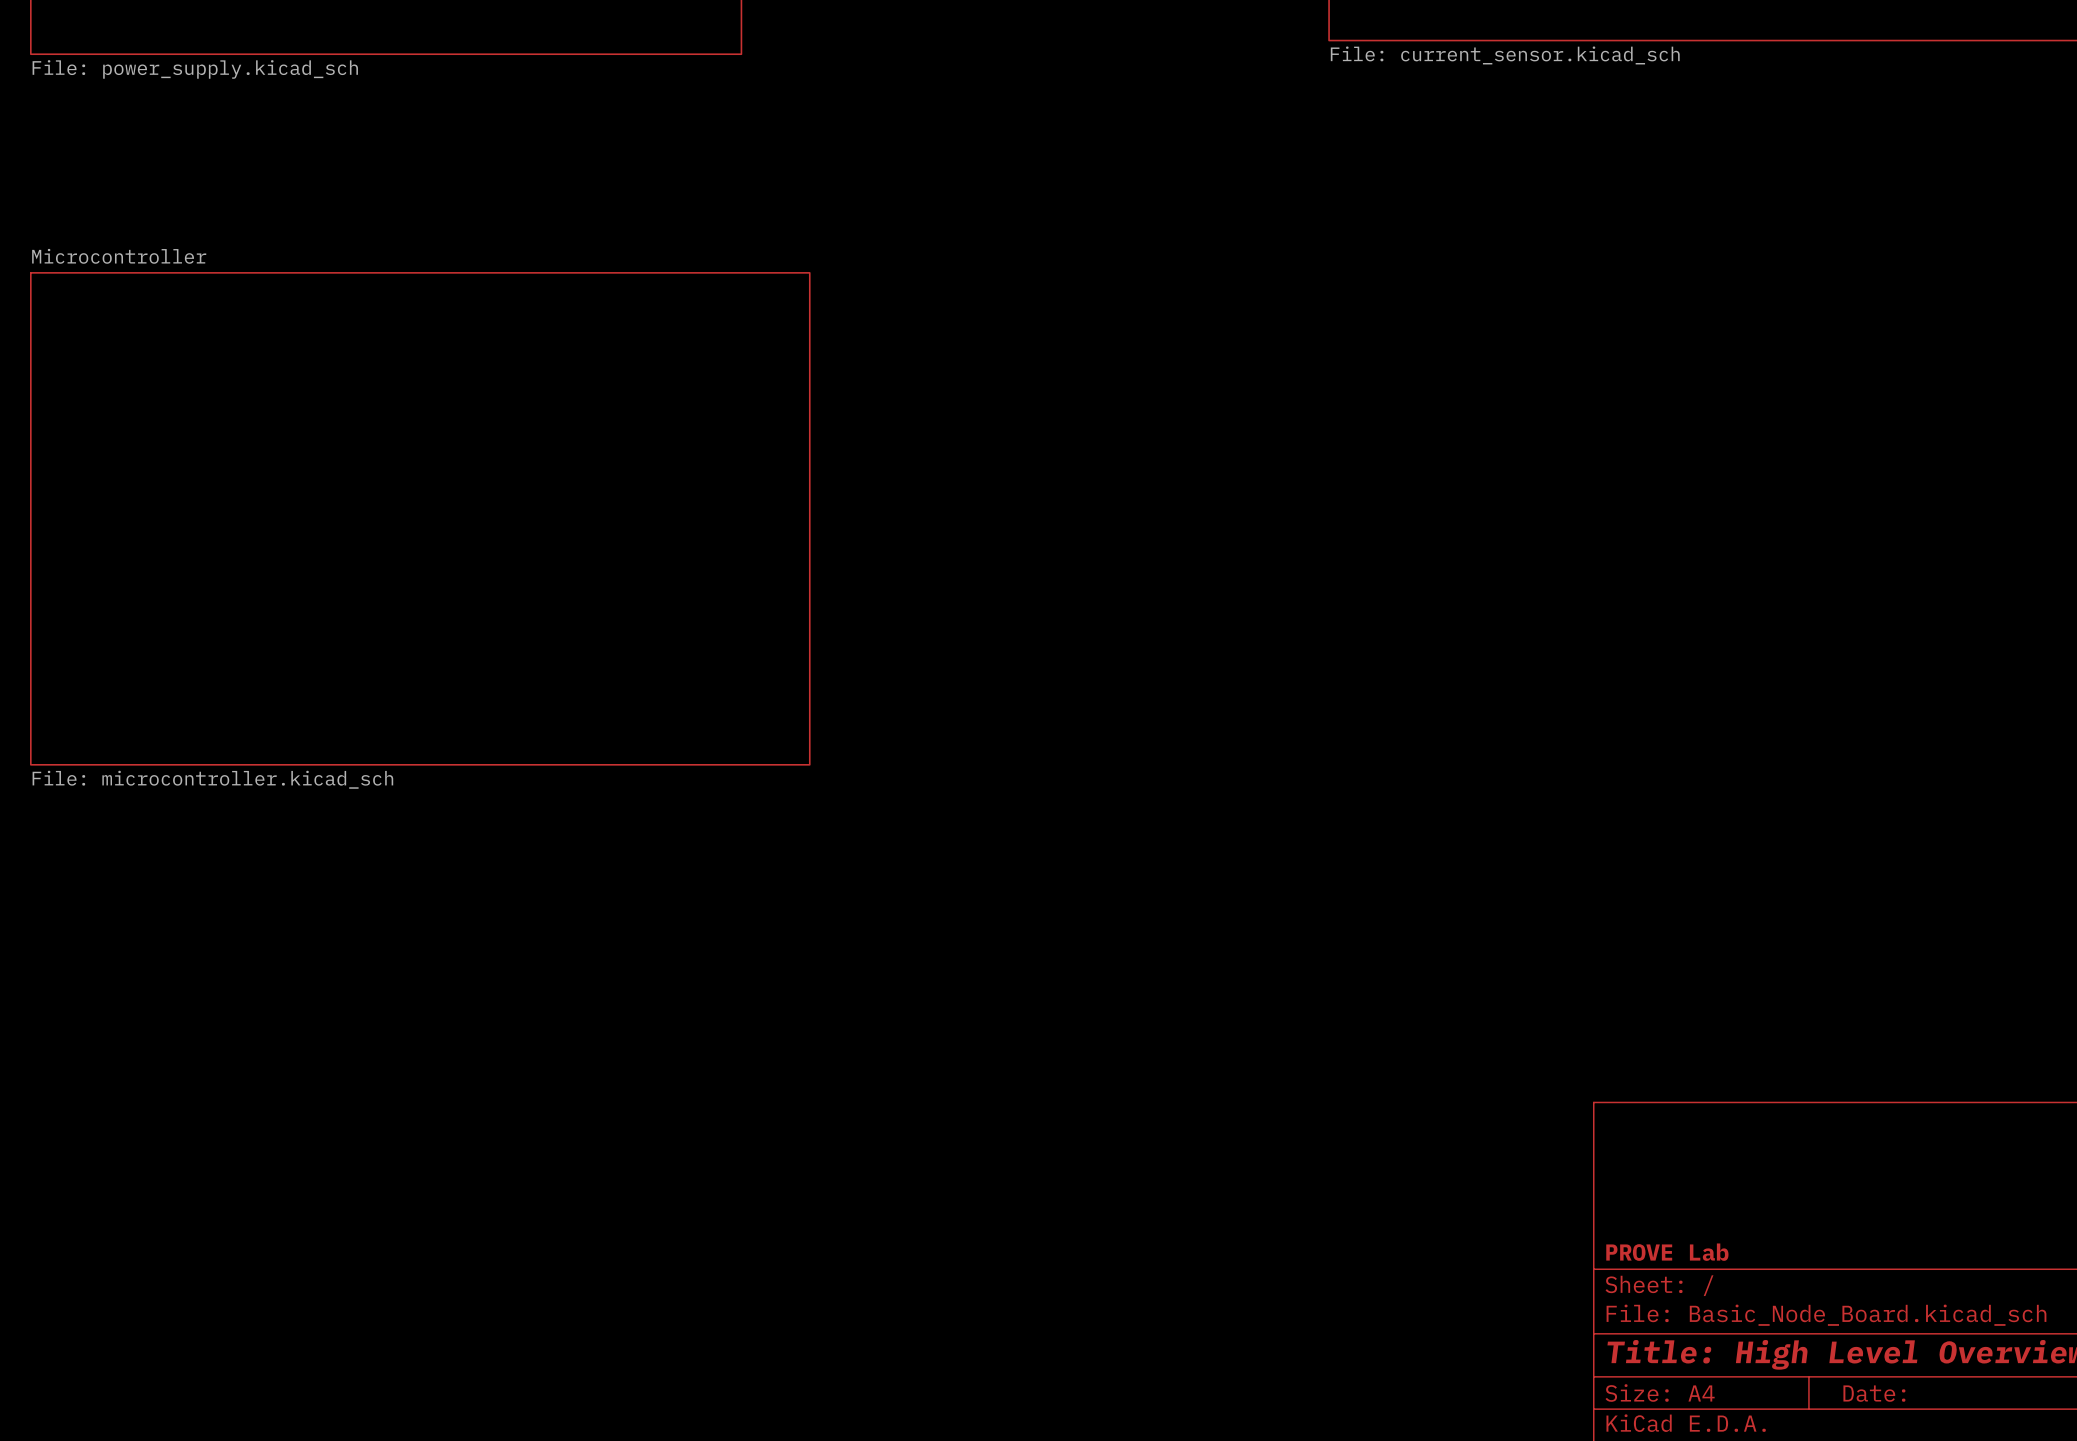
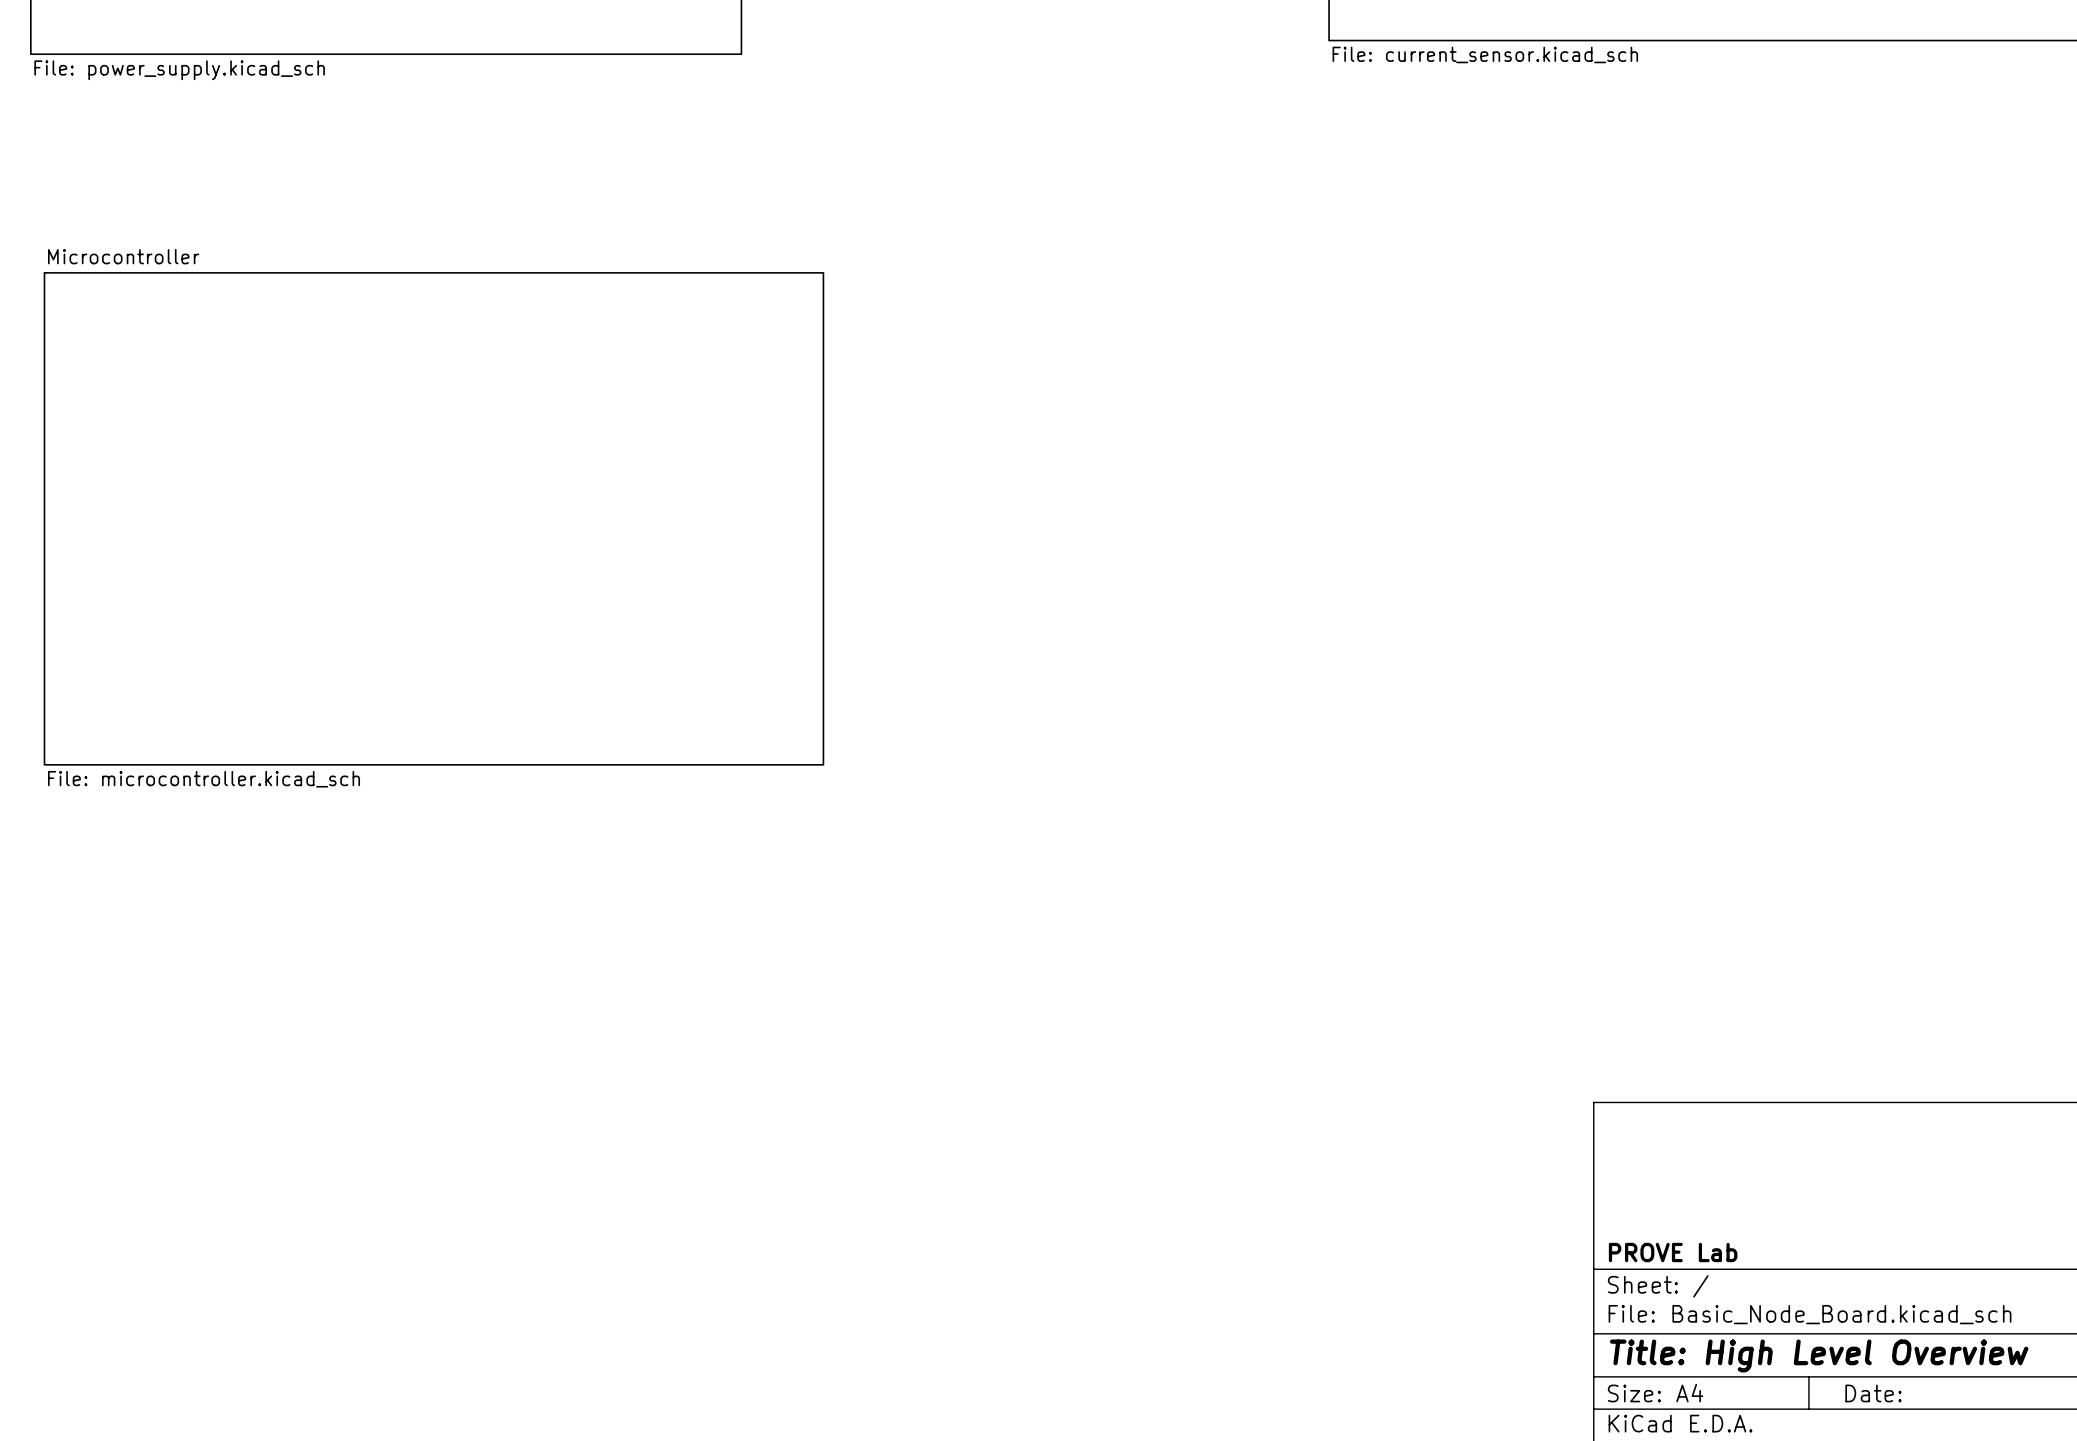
sheet Microcontroller position: (420, 518) -> (433, 518)

